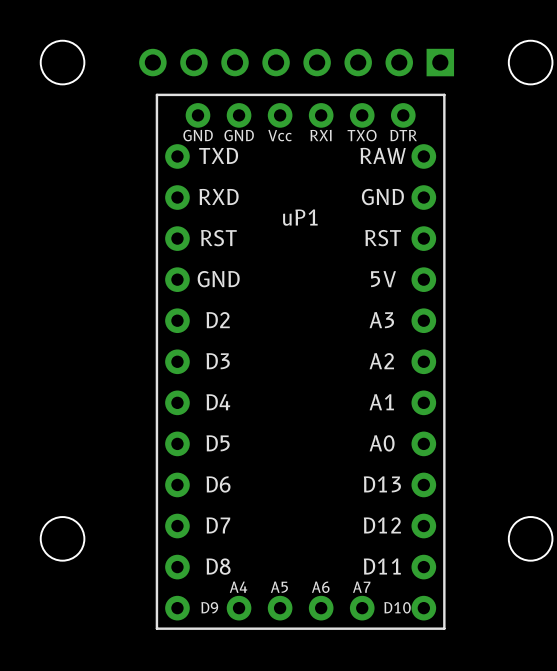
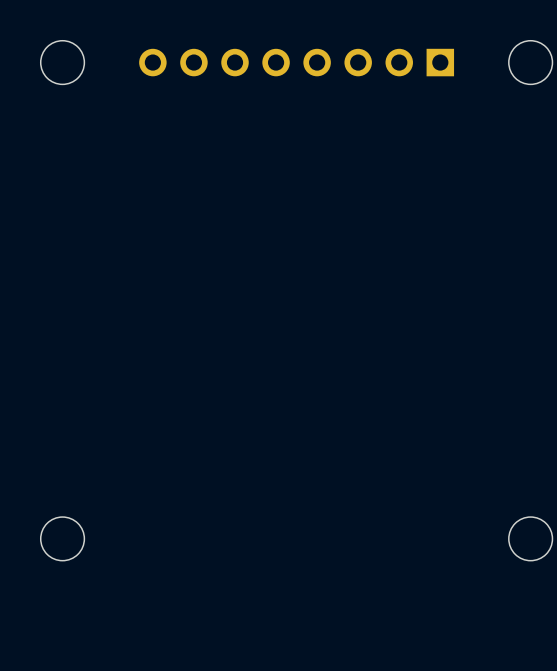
uP1: (300, 361) -> none

